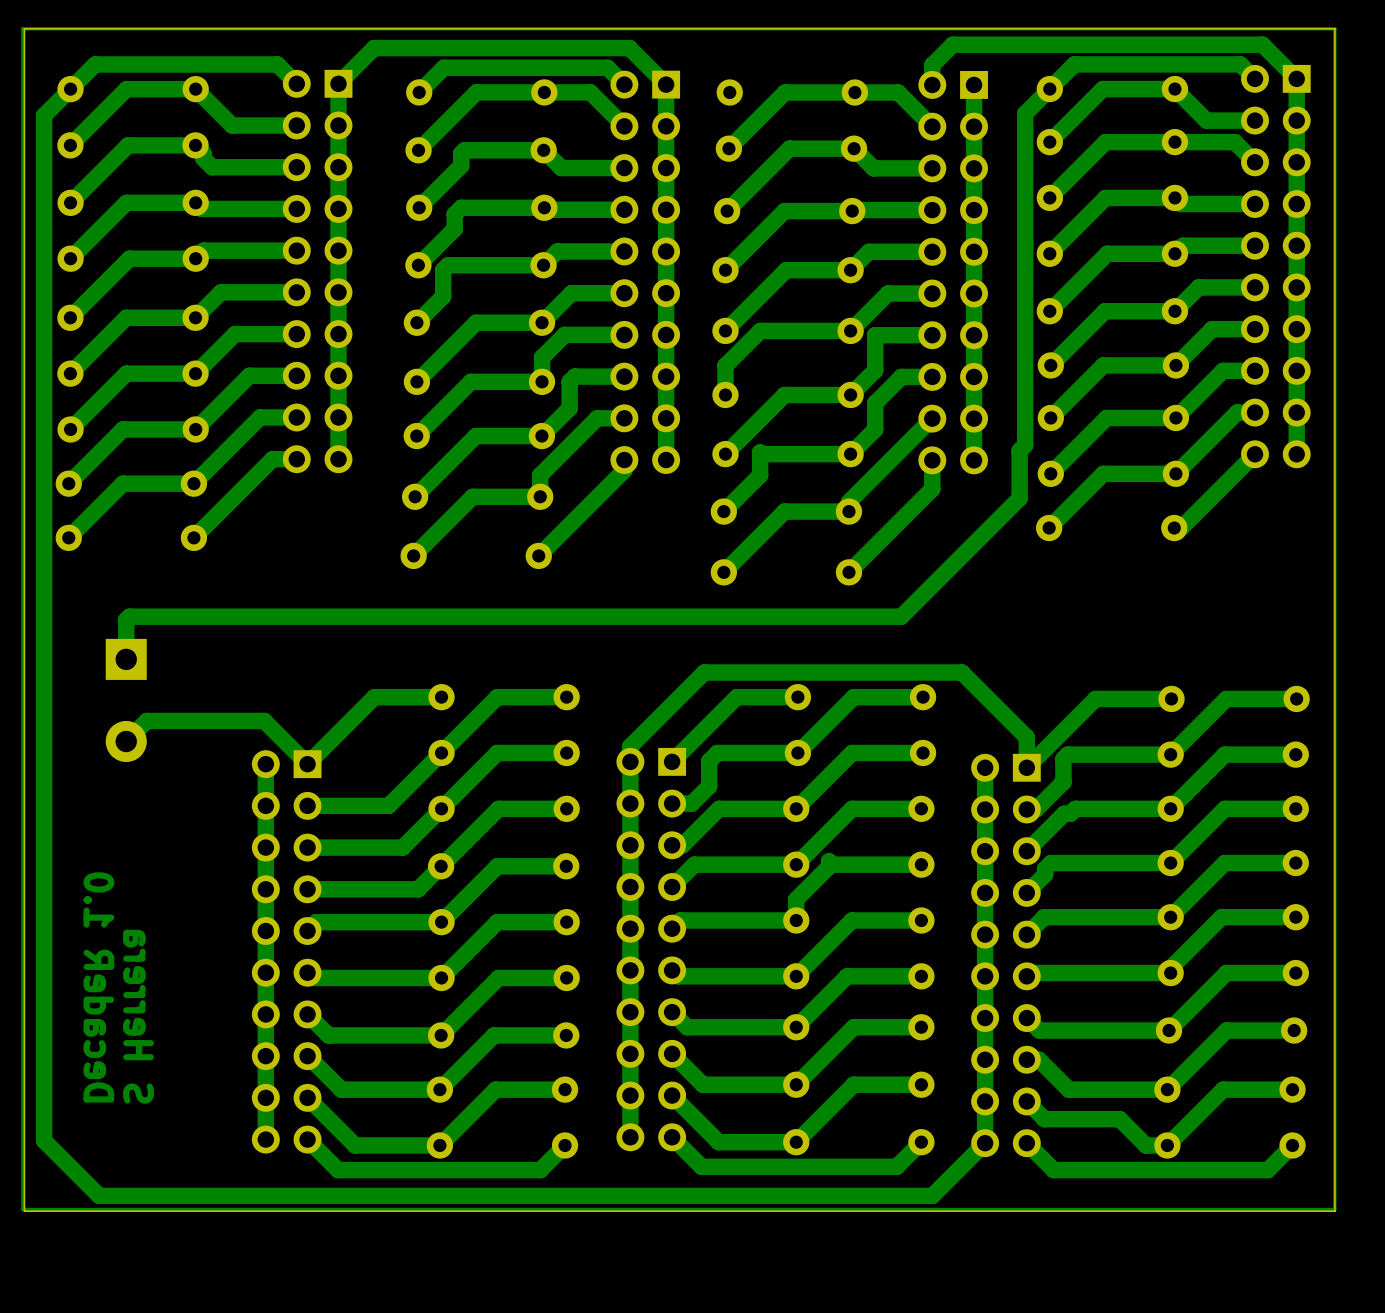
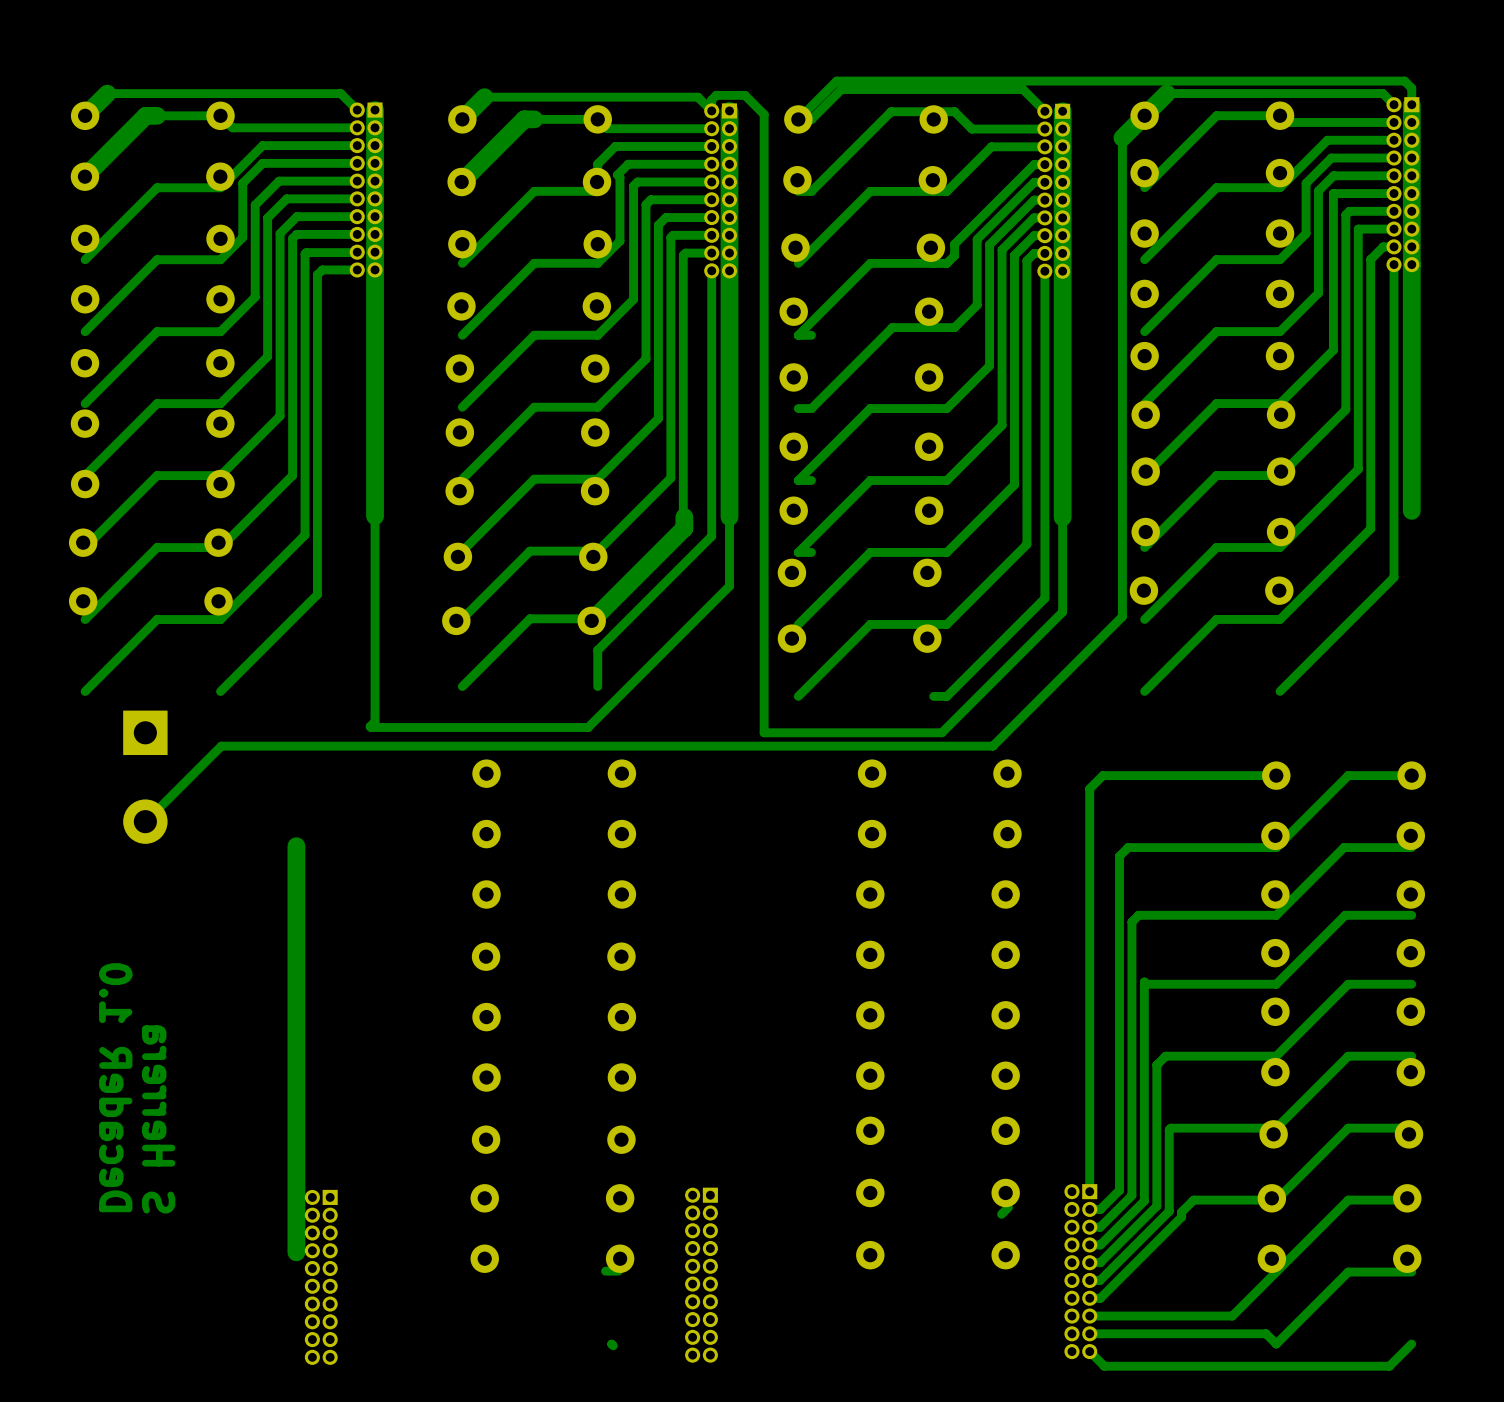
track: (1334, 28) (22, 28) (22, 1209) (1334, 1209) (1334, 28) -> none
board edge: (1334, 28) (24, 28) (24, 1211) (1334, 1211) (1334, 28) -> none
track: (91, 68) (95, 64) (277, 64) (296, 83) -> (107, 93) (340, 93) (357, 110)
track: (1070, 68) (1074, 64) (1240, 64) (1255, 78) -> (1166, 93) (1382, 93) (1394, 104)
track: (439, 71) (443, 67) (607, 67) (624, 84) -> (484, 97) (697, 97) (711, 110) (711, 99) (716, 95) (745, 95) (764, 114) (764, 732) (941, 732) (1062, 612) (1062, 517)
track: (1296, 78) (1262, 44) (952, 44) (932, 65) (932, 84) -> (1411, 104) (1411, 88) (1404, 81) (836, 81) (798, 119) (811, 119) (841, 89) (1023, 89) (1044, 111)
track: (338, 83) (374, 48) (629, 48) (666, 84) -> none
track: (70, 89) (44, 115) (44, 1140) (99, 1195) (932, 1195) (985, 1143) (985, 767) -> none
track width: thick (137, 89) (195, 89) (206, 100) -> thin (157, 115) (220, 115) (232, 127)
track: (1116, 89) (1102, 89) (1049, 142) -> (1216, 115) (1144, 187)
track width: thick (1116, 89) (1174, 89) (1181, 95) -> thin (1216, 115) (1280, 115) (1286, 122)
track: (544, 92) (590, 92) (624, 126) -> (597, 119) (607, 128) (711, 128)
track width: thick (544, 92) (485, 92) -> thin (597, 119) (534, 119)
track: (1181, 95) (1206, 120) (1255, 120) -> (1286, 122) (1394, 122)
track: (206, 100) (232, 125) (296, 125) -> (232, 127) (357, 127)
track: none -> (1044, 129) (971, 129) (954, 111) (891, 111) (811, 191) (798, 191)
track: (1029, 109) (1025, 113) (1025, 445) (1019, 450) (1019, 498) (901, 616) (129, 616) (126, 620) (126, 659) -> (1122, 137) (1122, 616) (992, 746) (221, 746) (137, 830)
track: none -> (1394, 140) (1327, 140) (1280, 187) (1216, 187) (1144, 259)
track: none -> (357, 145) (262, 145) (220, 187) (157, 187) (85, 259)
track: none -> (711, 146) (615, 146) (597, 164) (597, 191) (534, 191) (462, 263)
track: none -> (1044, 146) (991, 146) (946, 191) (870, 191) (798, 263)
track: (932, 126) (898, 92) (785, 92) (728, 148) -> none
track: none -> (1394, 158) (1331, 158) (1306, 183) (1306, 233) (1280, 259) (1216, 259) (1144, 331)
track: none -> (357, 163) (262, 163) (242, 183) (242, 237) (220, 259) (157, 259) (85, 331)
track: none -> (711, 164) (628, 164) (617, 174) (619, 177) (619, 241) (597, 263) (534, 263) (462, 335)
track: none -> (1044, 164) (1034, 164) (954, 244) (954, 255) (946, 263) (870, 263) (798, 335) (811, 335)
track: none -> (1394, 175) (1333, 175) (1318, 190) (1318, 293) (1280, 331) (1216, 331) (1144, 403)
track: none -> (357, 181) (279, 181) (255, 205) (255, 297) (220, 331) (157, 331) (85, 403)
track: none -> (711, 182) (637, 182) (633, 186) (633, 299) (597, 335) (534, 335) (462, 407)
track: none -> (1044, 182) (1034, 182) (977, 239) (977, 305) (954, 327) (892, 327) (811, 408) (798, 408)
part: none -> (1402, 184)
part: none -> (366, 190)
part: none -> (720, 190)
part: none -> (1053, 191)
track: none -> (1394, 193) (1333, 193) (1333, 350) (1280, 403) (1216, 403) (1144, 475)
track: (1255, 162) (1234, 142) (1105, 142) (1049, 197) -> none
track: none -> (357, 198) (286, 198) (267, 217) (267, 356) (220, 403) (157, 403) (85, 475)
track: none -> (711, 199) (650, 199) (645, 204) (645, 358) (597, 407) (534, 407) (462, 479)
track: (296, 167) (212, 167) (203, 158) (203, 153) (195, 145) (128, 145) (70, 202) -> none
track: none -> (1044, 200) (1034, 200) (989, 244) (989, 365) (946, 408) (870, 408) (798, 480) (811, 480)
track: (624, 168) (561, 168) (543, 150) (464, 150) (461, 153) (461, 165) (419, 207) -> none
track: (932, 168) (873, 168) (854, 148) (789, 148) (727, 211) -> none
track: none -> (1394, 211) (1349, 211) (1345, 214) (1345, 409) (1280, 475) (1216, 475) (1144, 547)
track: none -> (357, 216) (296, 216) (280, 233) (280, 416) (220, 475) (157, 475) (85, 547)
track: none -> (711, 217) (665, 217) (658, 225) (658, 418) (597, 479) (534, 479) (462, 551)
track: none -> (1044, 217) (1034, 217) (1002, 249) (1002, 425) (946, 480) (870, 480) (798, 552) (811, 552)
track: none -> (1394, 229) (1358, 229) (1358, 469) (1280, 547) (1216, 547) (1144, 619)
track: none -> (357, 234) (296, 234) (292, 238) (292, 475) (220, 547) (157, 547) (85, 619)
track: none -> (711, 235) (673, 235) (670, 237) (670, 478) (597, 551) (530, 551) (462, 618)
track: none -> (1044, 235) (1034, 235) (1014, 255) (1014, 484) (946, 552) (870, 552) (798, 624)
track: (1255, 204) (1181, 204) (1174, 197) (1105, 197) (1049, 253) -> none
track: (296, 208) (201, 208) (195, 202) (126, 202) (70, 258) -> none
track: (624, 209) (461, 207) (454, 214) (454, 228) (418, 265) -> none
track: (932, 210) (784, 211) (725, 270) -> none
track: none -> (1394, 246) (1383, 246) (1370, 259) (1370, 528) (1280, 619) (1216, 619) (1144, 691)
track: none -> (357, 252) (305, 253) (305, 535) (220, 619) (157, 619) (85, 691)
track: none -> (711, 253) (685, 253) (683, 255) (683, 533) (597, 618) (530, 618) (462, 686)
track: none -> (1044, 253) (1034, 253) (1026, 260) (1026, 544) (946, 624) (870, 624) (798, 696)
track: none -> (1394, 264) (1394, 577) (1280, 691)
track: none -> (357, 269) (322, 269) (317, 274) (317, 594) (220, 691)
track: none -> (711, 270) (711, 536) (597, 650) (597, 686)
track: none -> (1044, 271) (1044, 598) (946, 696) (933, 696)
track: (1255, 245) (1182, 245) (1174, 253) (1107, 253) (1049, 311) -> none
track: (296, 250) (203, 250) (195, 258) (129, 258) (70, 317) -> none
track: (624, 251) (557, 251) (543, 265) (448, 265) (443, 270) (443, 296) (416, 322) -> none
track: (932, 251) (869, 251) (850, 270) (786, 270) (725, 330) -> none
part: (1275, 266) -> none
part: (317, 271) -> none
part: (645, 272) -> none
part: (953, 272) -> none
track: (1255, 287) (1198, 287) (1174, 311) (1104, 311) (1050, 365) -> none
track: (296, 292) (221, 292) (195, 317) (126, 317) (70, 373) -> none
track: (624, 293) (571, 293) (542, 322) (476, 322) (416, 381) -> none
track: (932, 293) (888, 293) (850, 330) (760, 330) (725, 365) (725, 395) -> none
track: (1255, 329) (1212, 329) (1175, 365) (1103, 365) (1050, 417) -> none
track: (296, 334) (235, 334) (195, 373) (126, 373) (70, 429) -> none
track: (624, 334) (564, 334) (542, 357) (542, 381) (470, 381) (416, 436) -> none
track: (932, 335) (875, 335) (875, 370) (850, 395) (784, 395) (725, 454) -> none
track: (1255, 370) (1223, 370) (1175, 417) (1106, 417) (1050, 473) -> none
track: (296, 375) (249, 375) (195, 429) (122, 429) (68, 483) -> none
track: (624, 376) (574, 376) (569, 381) (569, 408) (541, 436) (475, 436) (415, 496) -> none
track: (932, 376) (901, 376) (875, 403) (875, 429) (850, 454) (761, 454) (760, 452) (760, 475) (723, 511) -> none
track: (1255, 412) (1237, 412) (1175, 473) (1103, 473) (1049, 528) -> none
track: (296, 417) (260, 417) (193, 483) (122, 483) (68, 537) -> none
track: (624, 418) (597, 418) (540, 475) (540, 496) (472, 496) (413, 555) -> none
track: (932, 418) (848, 501) (848, 511) (784, 511) (723, 572) -> none
track: (1255, 454) (1181, 528) (1174, 528) -> none
track: (296, 459) (272, 459) (193, 537) -> none
track: none -> (375, 516) (375, 721) (371, 727) (588, 727) (729, 586) (729, 517)
track: (932, 460) (932, 489) (848, 572) -> none
track: (441, 697) (374, 697) (307, 764) (264, 720) (146, 720) (126, 741) -> none
track: (566, 697) (497, 697) (388, 805) (307, 805) -> none
track: (797, 697) (736, 697) (672, 761) -> none
track: (923, 697) (853, 697) (797, 752) (717, 752) (709, 761) (709, 786) (691, 803) (672, 803) -> none
track: (1095, 698) (1026, 767) (1026, 737) (961, 672) (704, 672) (630, 746) (630, 1133) (627, 1137) (630, 1137) -> (1194, 775) (1102, 775) (1089, 788) (1089, 1191)
track width: thick (1171, 698) (1095, 698) -> thin (1276, 775) (1194, 775)
track: (1238, 698) (1226, 698) (1170, 754) (1067, 754) (1063, 759) (1063, 782) (1036, 809) (1026, 809) -> (1348, 775) (1276, 847) (1128, 847) (1119, 856) (1119, 1190) (1100, 1209) (1089, 1209)
track width: thick (1296, 698) (1238, 698) -> thin (1411, 775) (1348, 775)
track: (566, 752) (497, 752) (402, 847) (307, 847) -> none
track: (923, 752) (852, 752) (796, 808) (719, 808) (682, 845) (672, 845) -> none
track: (1295, 754) (1224, 754) (1170, 808) (1075, 808) (1070, 813) (1064, 813) (1026, 851) -> none
track: none -> (1411, 847) (1343, 847) (1276, 915) (1138, 915) (1131, 922) (1131, 1195) (1100, 1227) (1089, 1227)
track: (566, 808) (498, 808) (418, 889) (307, 889) -> none
track: (921, 808) (852, 808) (796, 864) (694, 864) (672, 887) -> none
track: (1295, 808) (1224, 808) (1170, 863) (1051, 863) (1045, 868) (1045, 874) (1026, 892) -> none
track: none -> (1411, 915) (1345, 915) (1276, 984) (1146, 984) (1144, 982) (1144, 1201) (1100, 1244) (1089, 1244)
track: (1295, 863) (1224, 863) (1170, 917) (1044, 917) (1026, 934) -> none
track: (921, 864) (832, 864) (829, 861) (829, 866) (796, 899) (796, 920) (680, 920) (672, 928) -> none
track: (566, 866) (497, 866) (441, 922) (316, 922) (307, 931) -> none
track: none -> (1411, 984) (1348, 984) (1276, 1056) (1165, 1056) (1156, 1065) (1156, 1206) (1100, 1262) (1089, 1262)
track: (1295, 917) (1221, 917) (1170, 968) (1170, 973) (1030, 973) (1026, 976) -> none
track: (921, 920) (852, 920) (796, 976) (678, 976) (672, 970) -> none
track: (566, 922) (497, 922) (441, 977) (312, 977) (307, 972) -> none
part: (651, 949) -> none
part: (286, 951) -> none
part: (1005, 955) -> none
track: none -> (1411, 1056) (1348, 1056) (1276, 1128) (1171, 1128) (1169, 1129) (1169, 1211) (1100, 1280) (1089, 1280)
track: (1295, 973) (1226, 973) (1169, 1030) (1039, 1030) (1026, 1018) -> none
track: (921, 976) (847, 976) (796, 1027) (687, 1027) (672, 1012) -> none
track: (566, 977) (498, 977) (441, 1035) (328, 1035) (307, 1014) -> none
track: none -> (1411, 1128) (1348, 1128) (1276, 1200) (1193, 1200) (1181, 1212) (1181, 1217) (1100, 1298) (1089, 1298)
track: (921, 1027) (853, 1027) (796, 1084) (702, 1084) (672, 1053) -> none
track: (1294, 1030) (1226, 1030) (1167, 1089) (1068, 1089) (1038, 1059) (1026, 1059) -> none
track: (566, 1035) (494, 1035) (439, 1089) (341, 1089) (307, 1056) -> none
track: (921, 1084) (853, 1084) (796, 1142) (718, 1142) (672, 1095) -> none
track: (565, 1089) (495, 1089) (439, 1145) (355, 1145) (307, 1097) -> none
track: (1292, 1089) (1223, 1089) (1167, 1145) (1146, 1145) (1119, 1119) (1044, 1119) (1026, 1101) -> none
track: none -> (1411, 1200) (1348, 1200) (1232, 1316) (1089, 1316)
track: none -> (1008, 1207) (1001, 1214)
track: (672, 1137) (701, 1166) (896, 1166) (921, 1142) -> none
track: (307, 1139) (338, 1170) (540, 1170) (565, 1145) -> none
track: (1026, 1143) (1053, 1170) (1267, 1170) (1292, 1145) -> none
track: none -> (618, 1271) (605, 1271)
part: none -> (1080, 1271)
track: none -> (1411, 1272) (1348, 1272) (1276, 1344) (1266, 1333) (1089, 1333)
part: none -> (701, 1275)
part: none -> (321, 1277)
track: none -> (611, 1344) (613, 1345)
track: none -> (1411, 1344) (1389, 1366) (1104, 1366) (1089, 1351)

